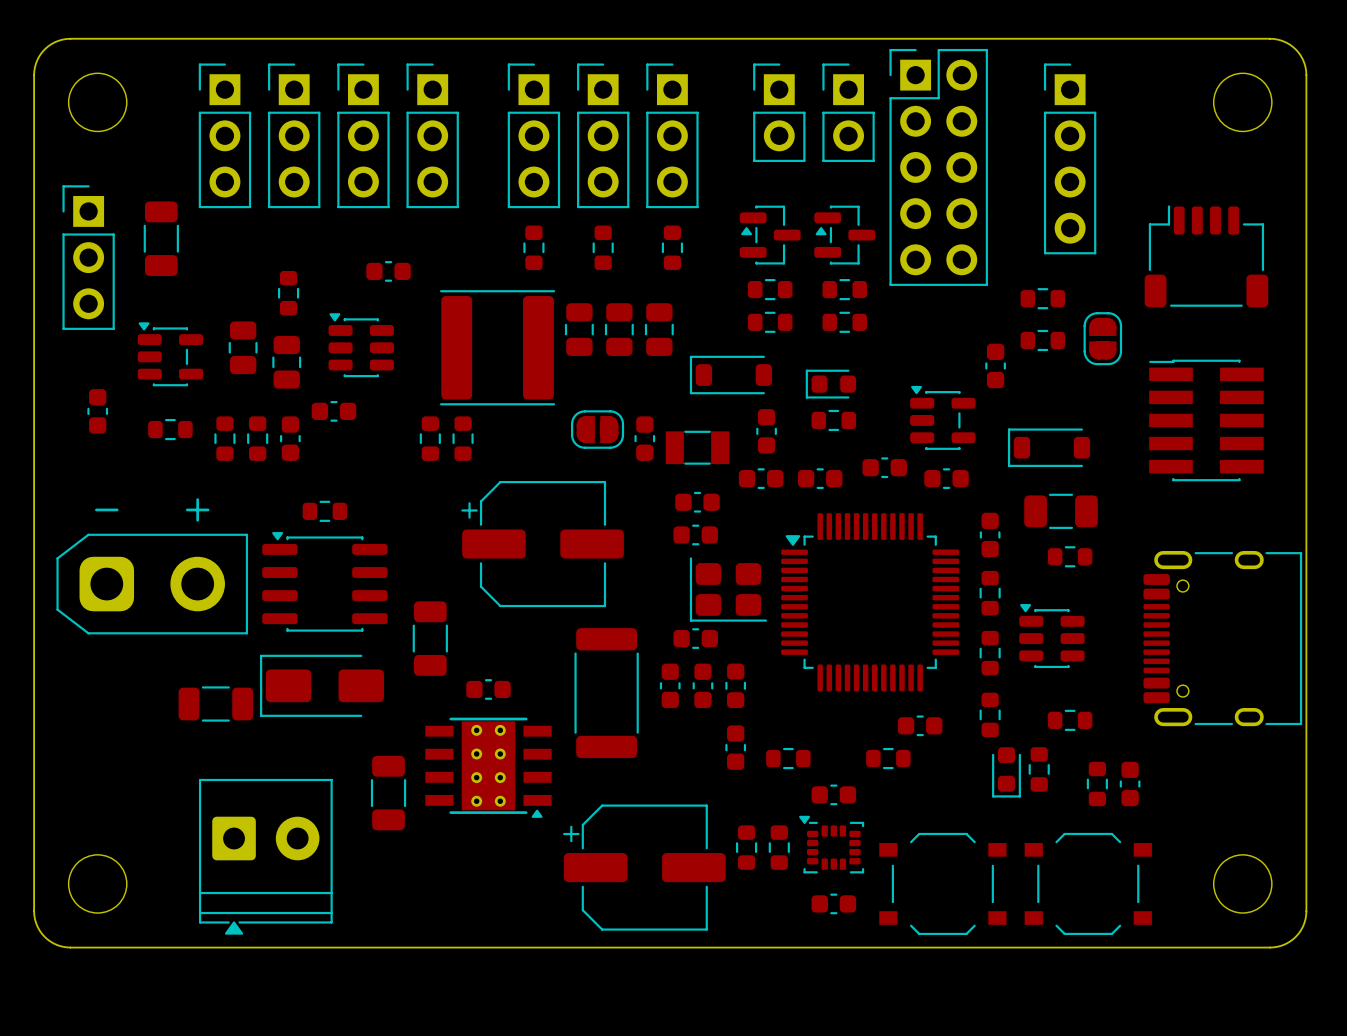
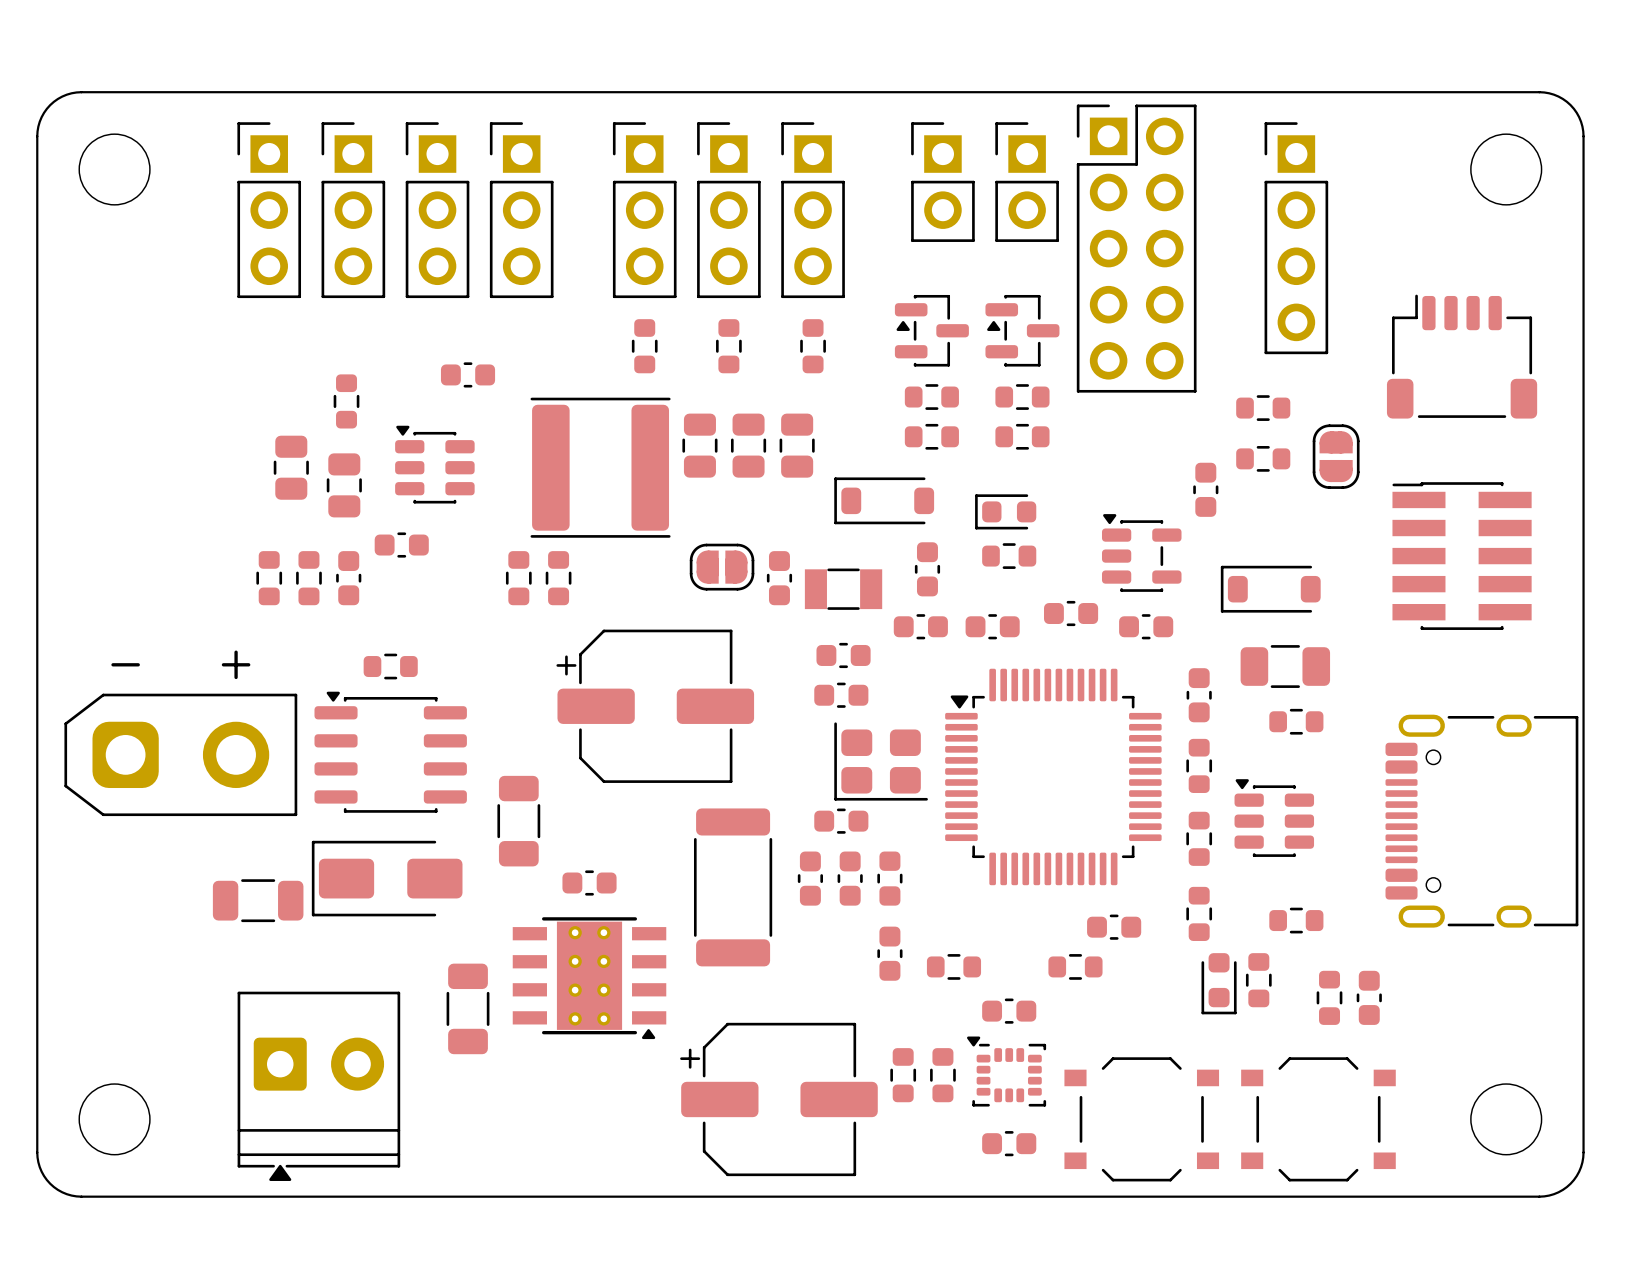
part: (161, 238) -> none
part: (88, 257) -> none
part: (170, 354) -> none
part: (97, 411) -> none
part: (170, 429) -> none

